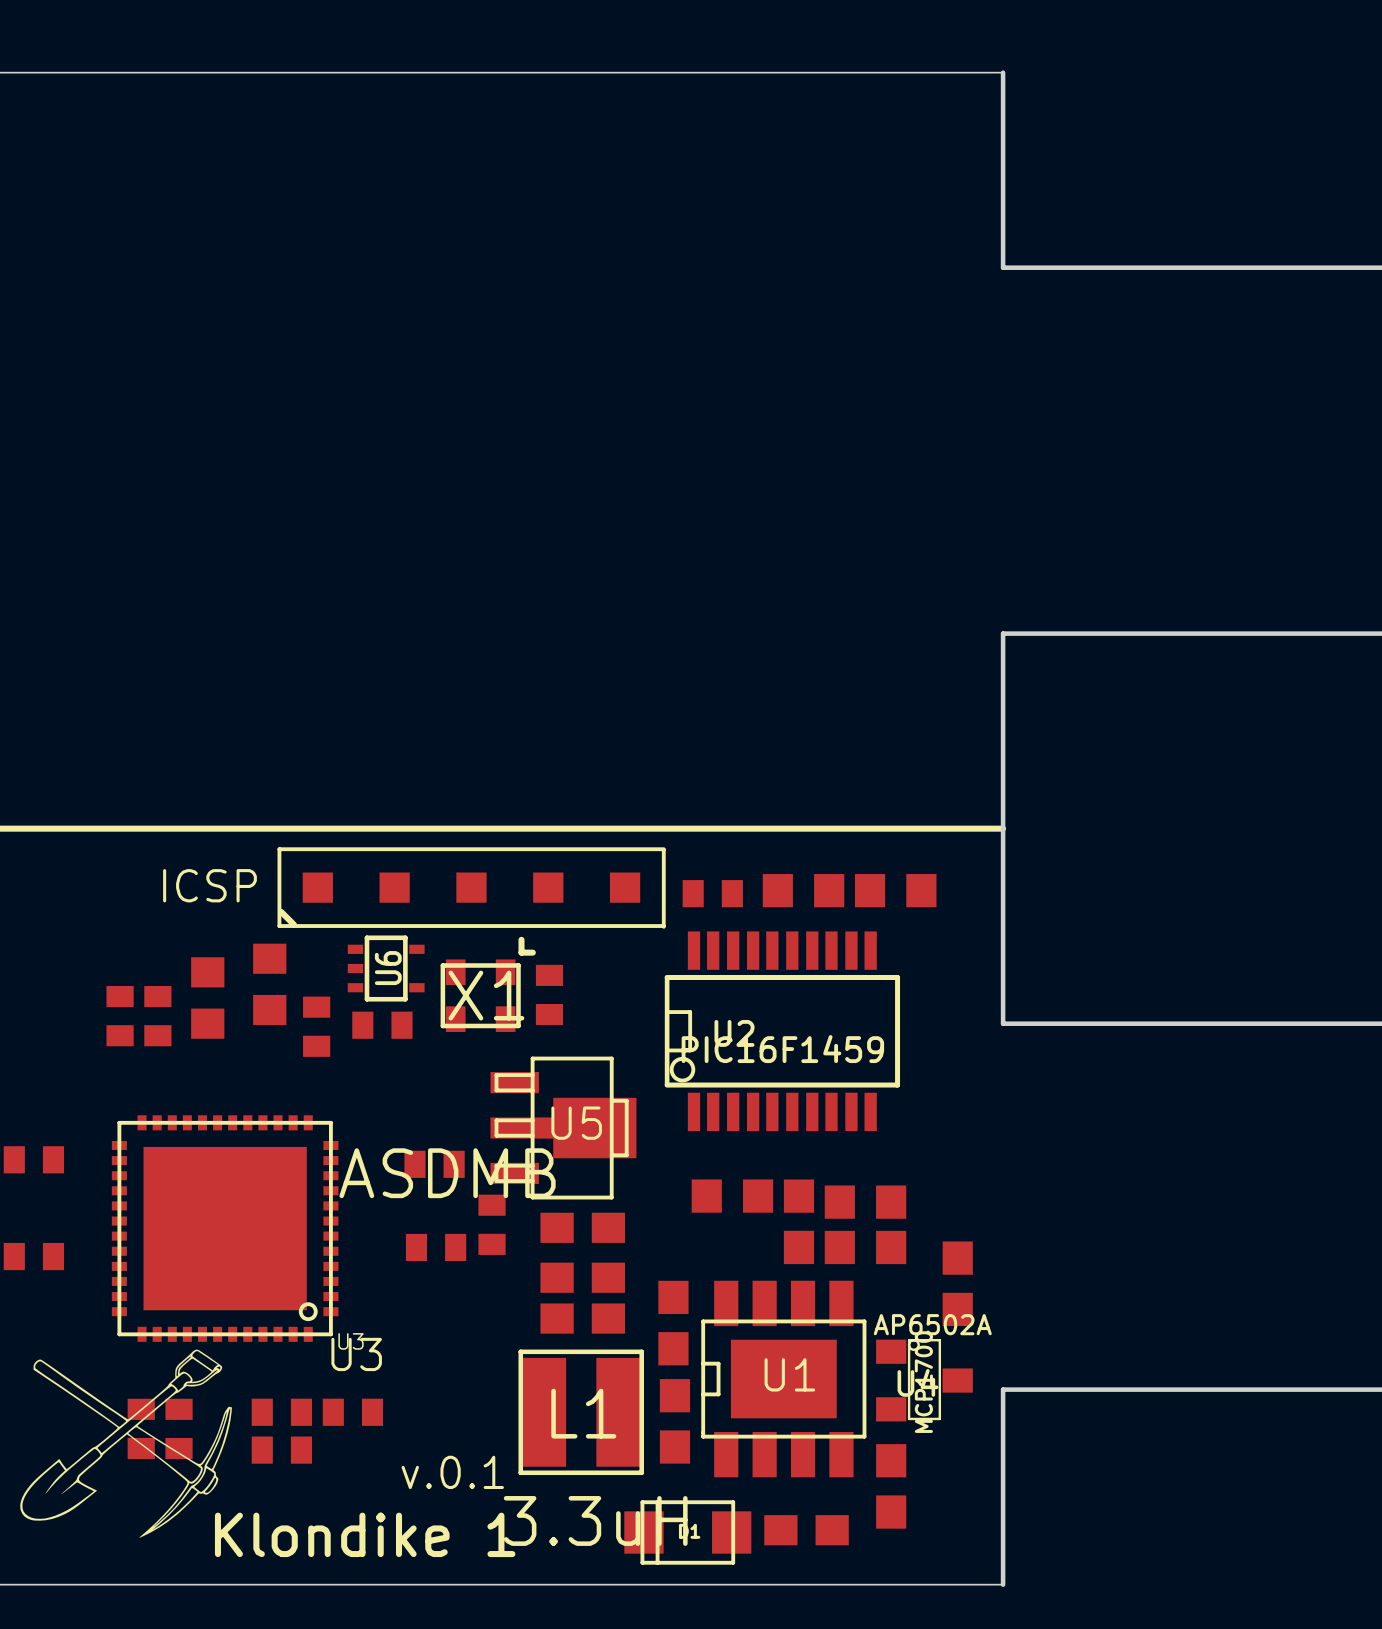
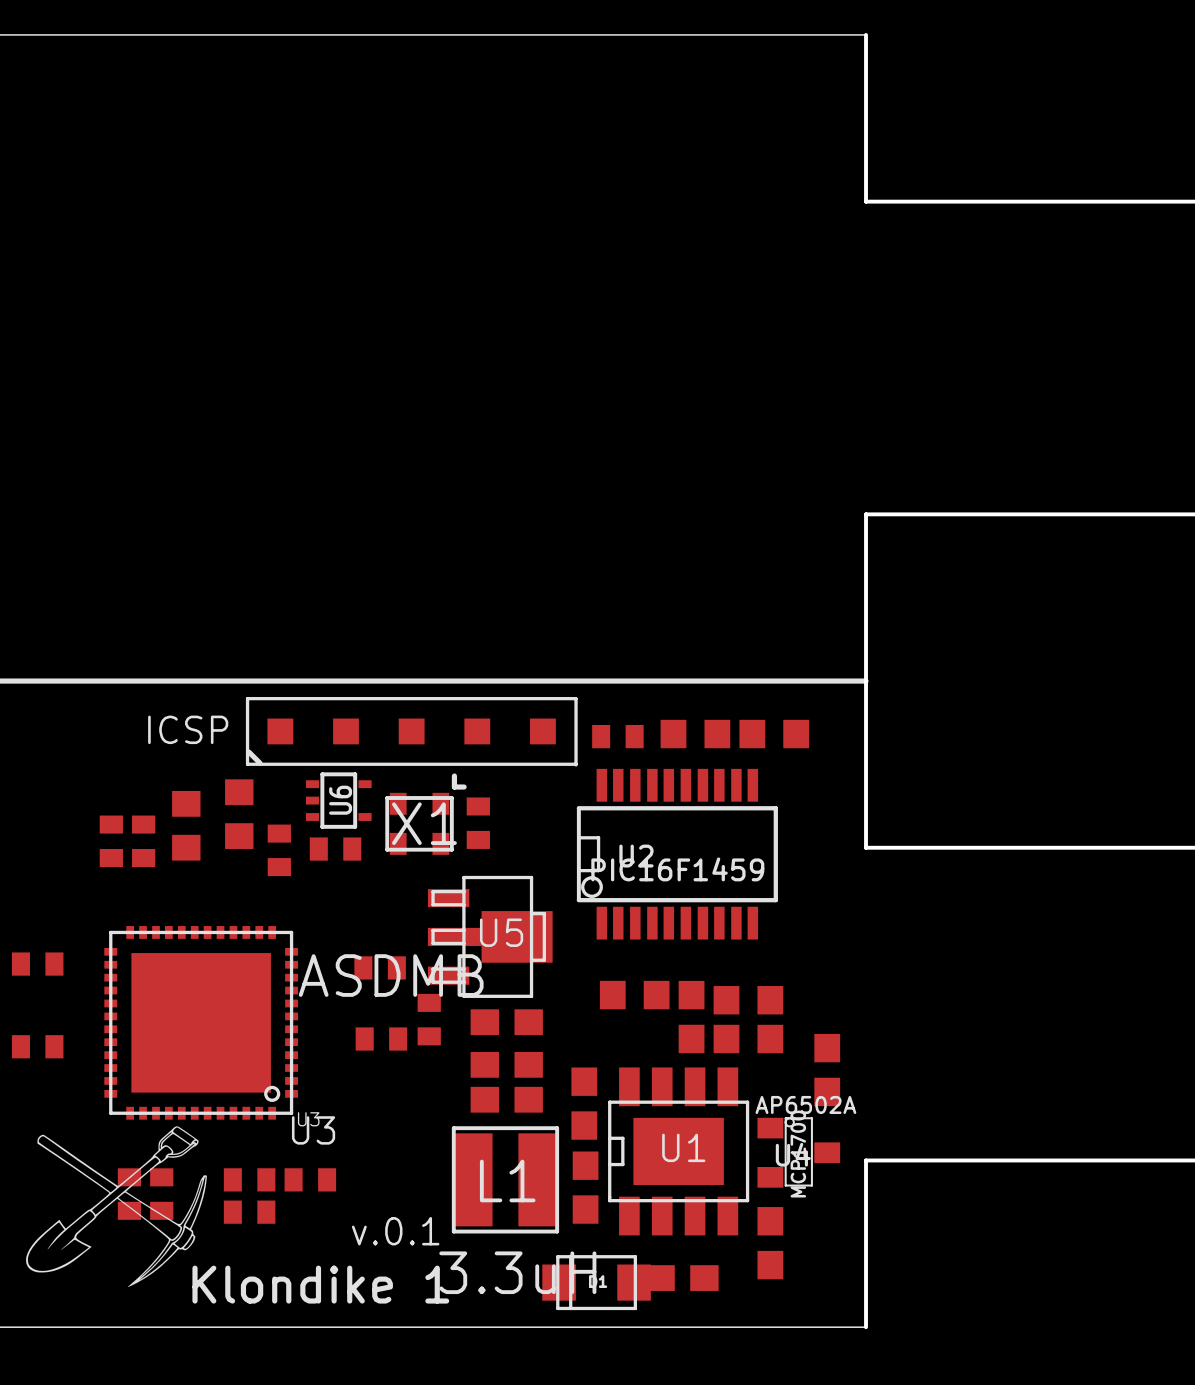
part position: (806, 1530) -> (682, 1278)

